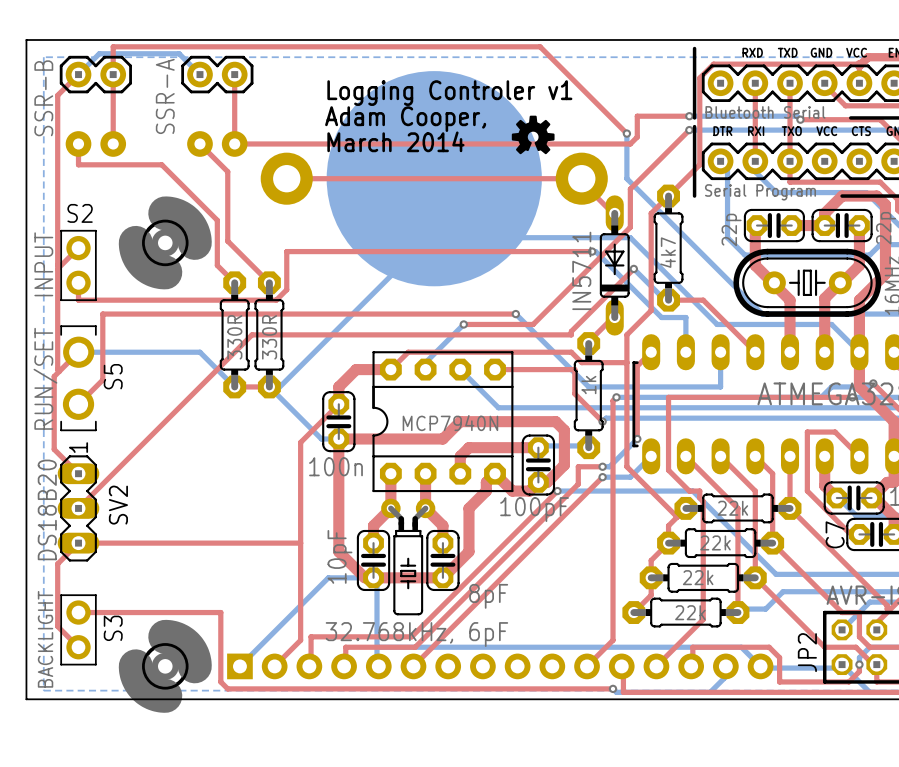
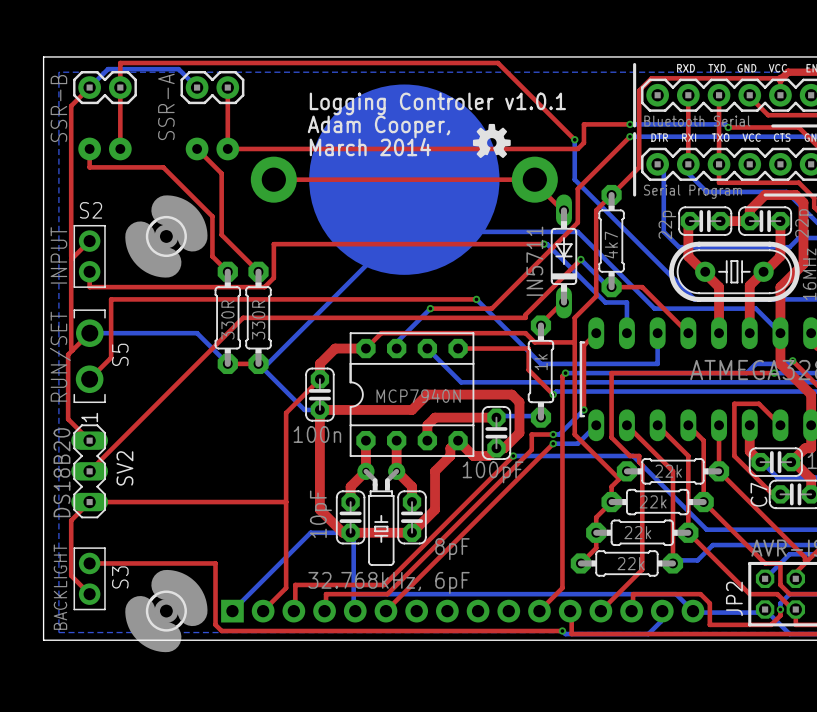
text: Logging Controler v1 (449, 93) -> Logging Controler v1.0.1 (437, 103)

